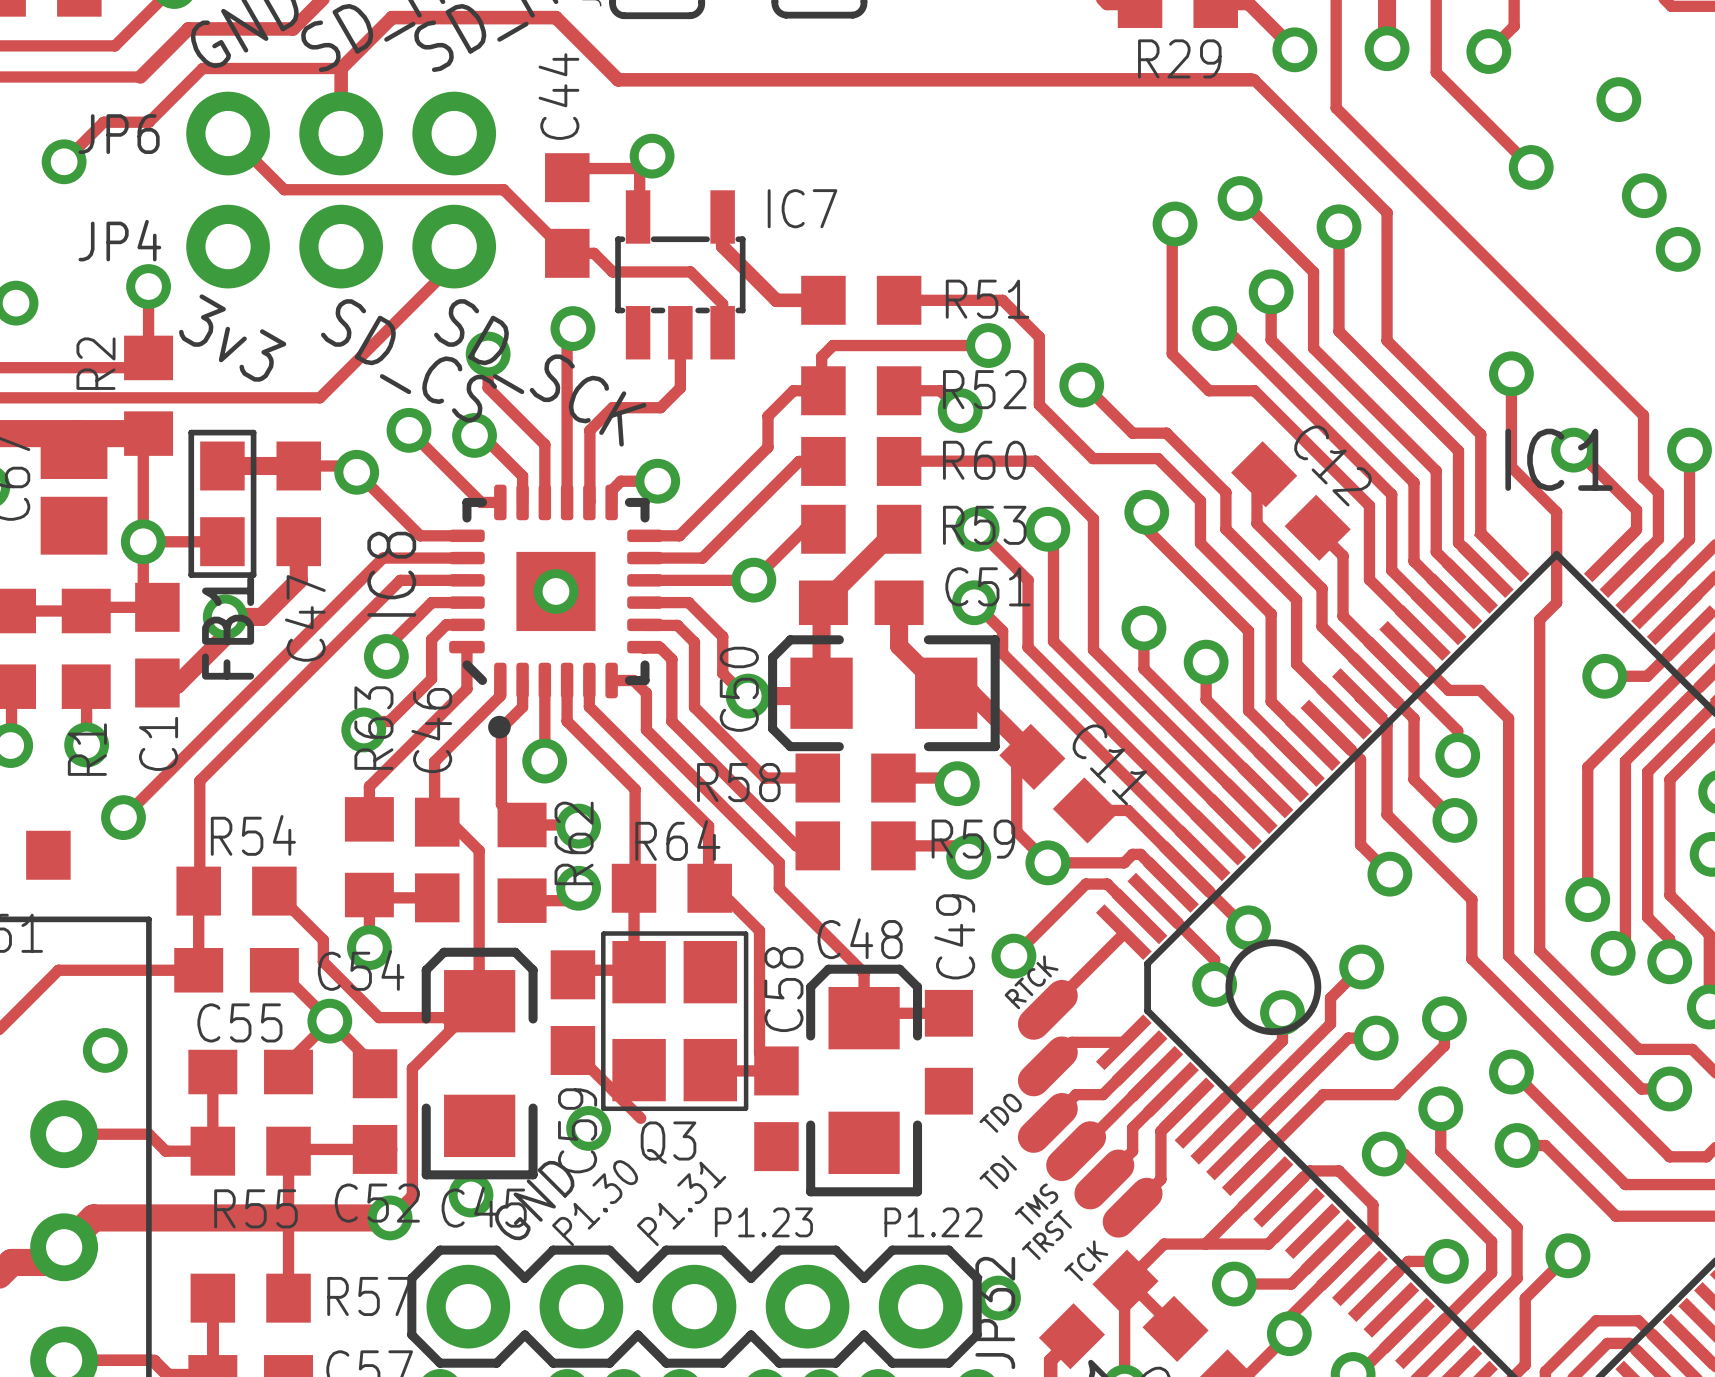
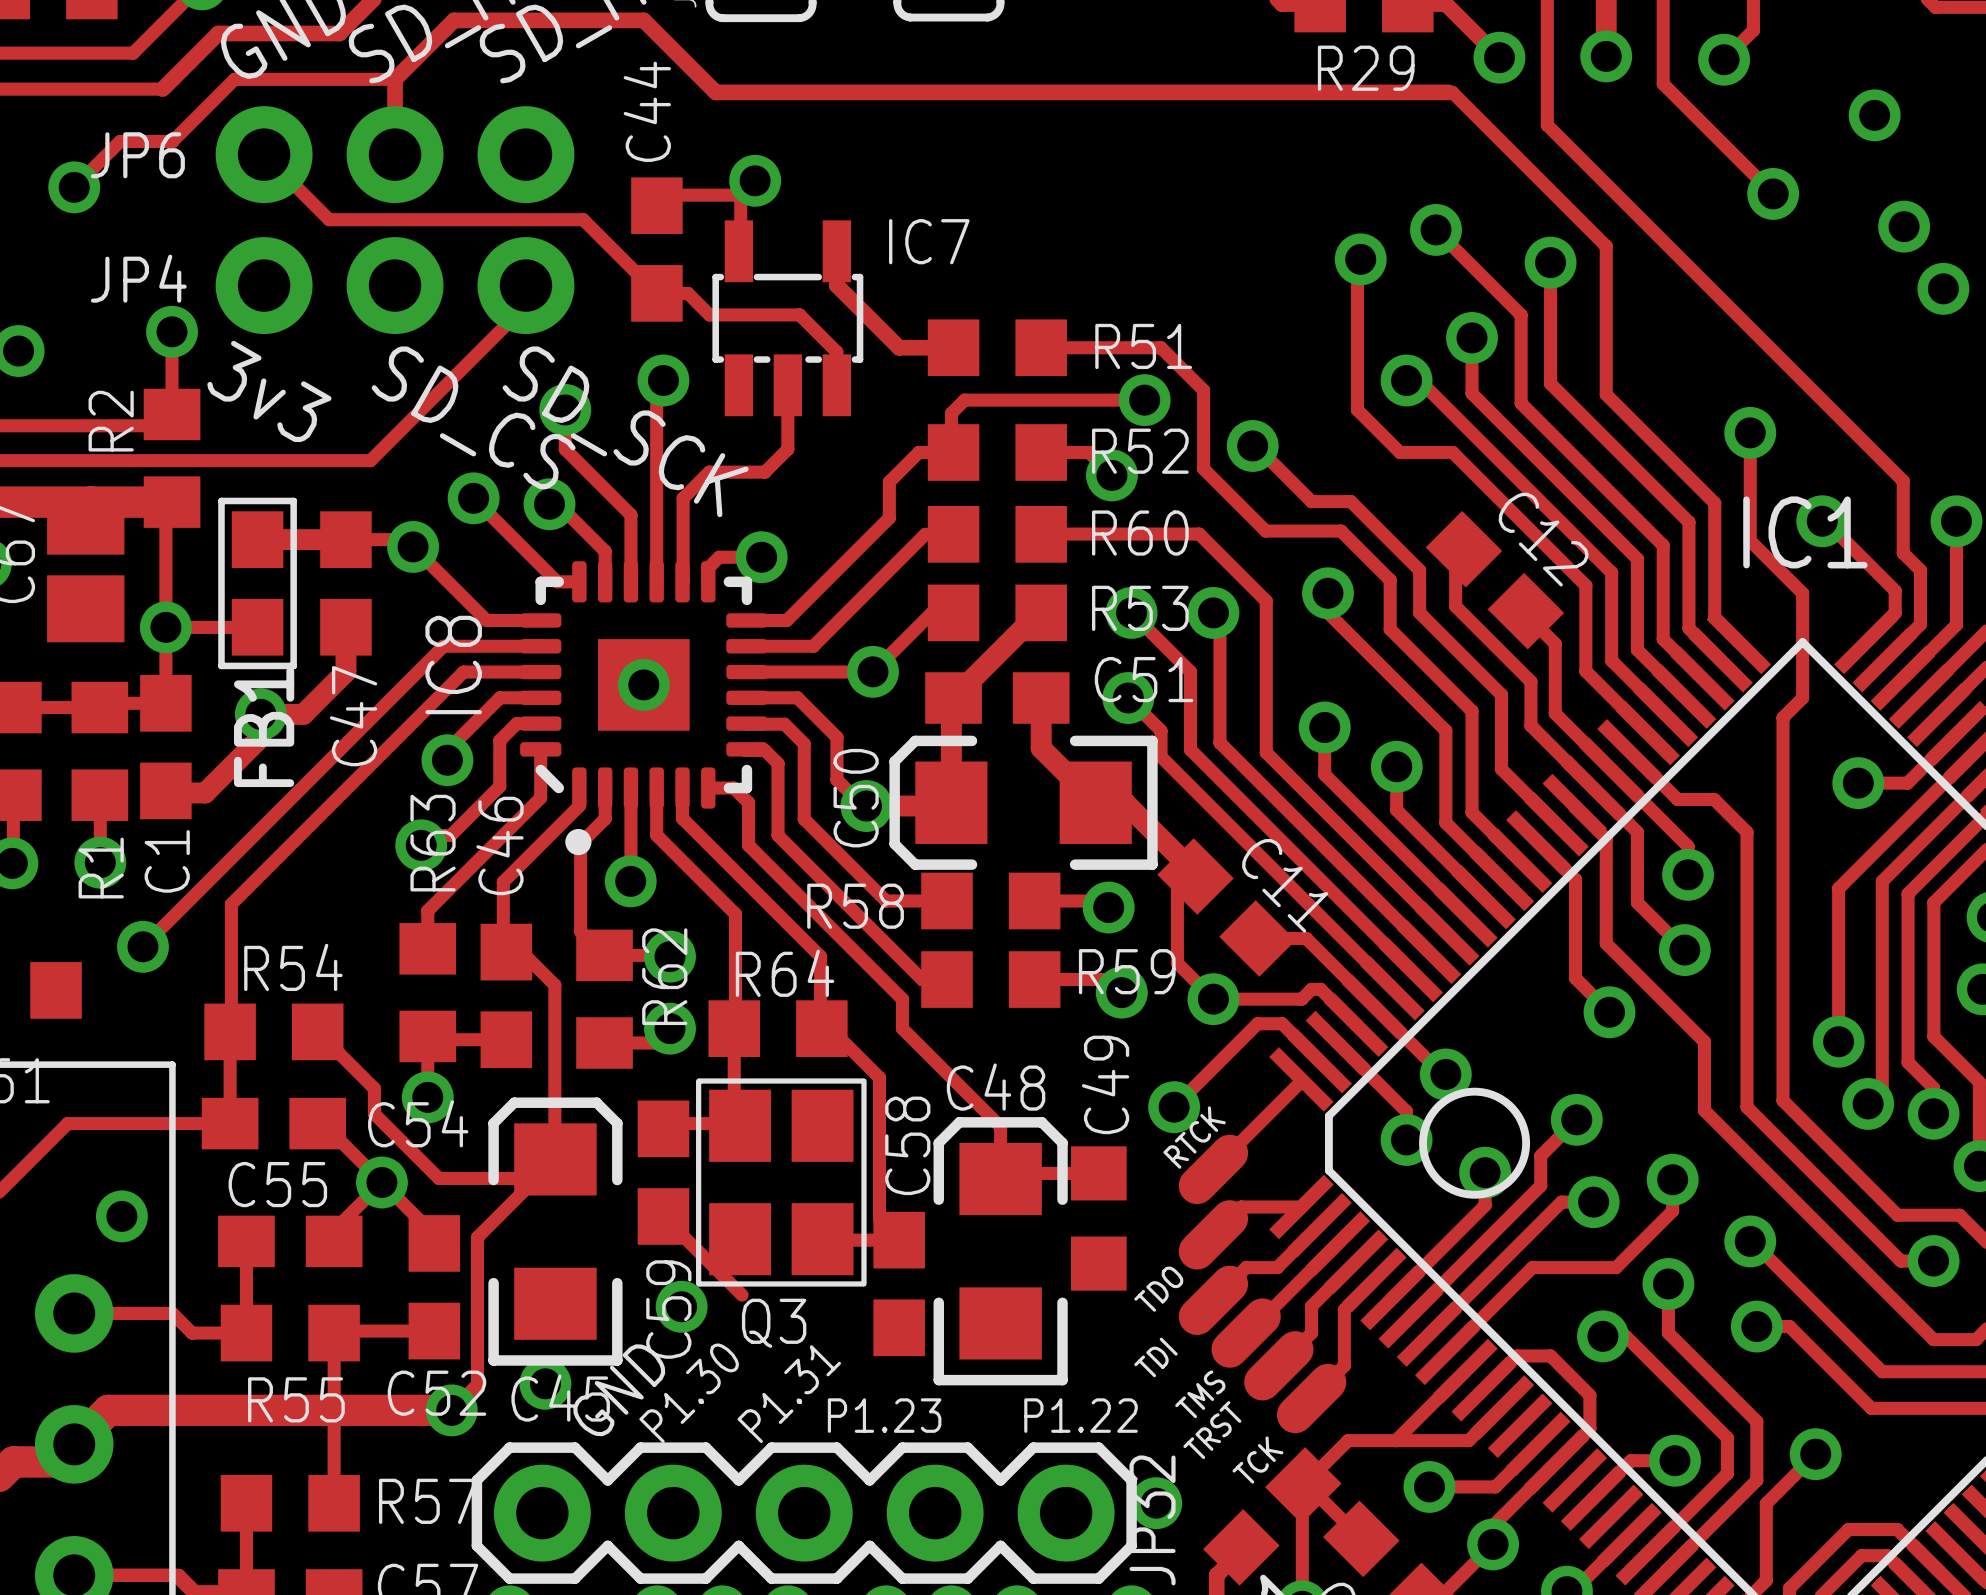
C1 position: (157, 645) -> (165, 747)

